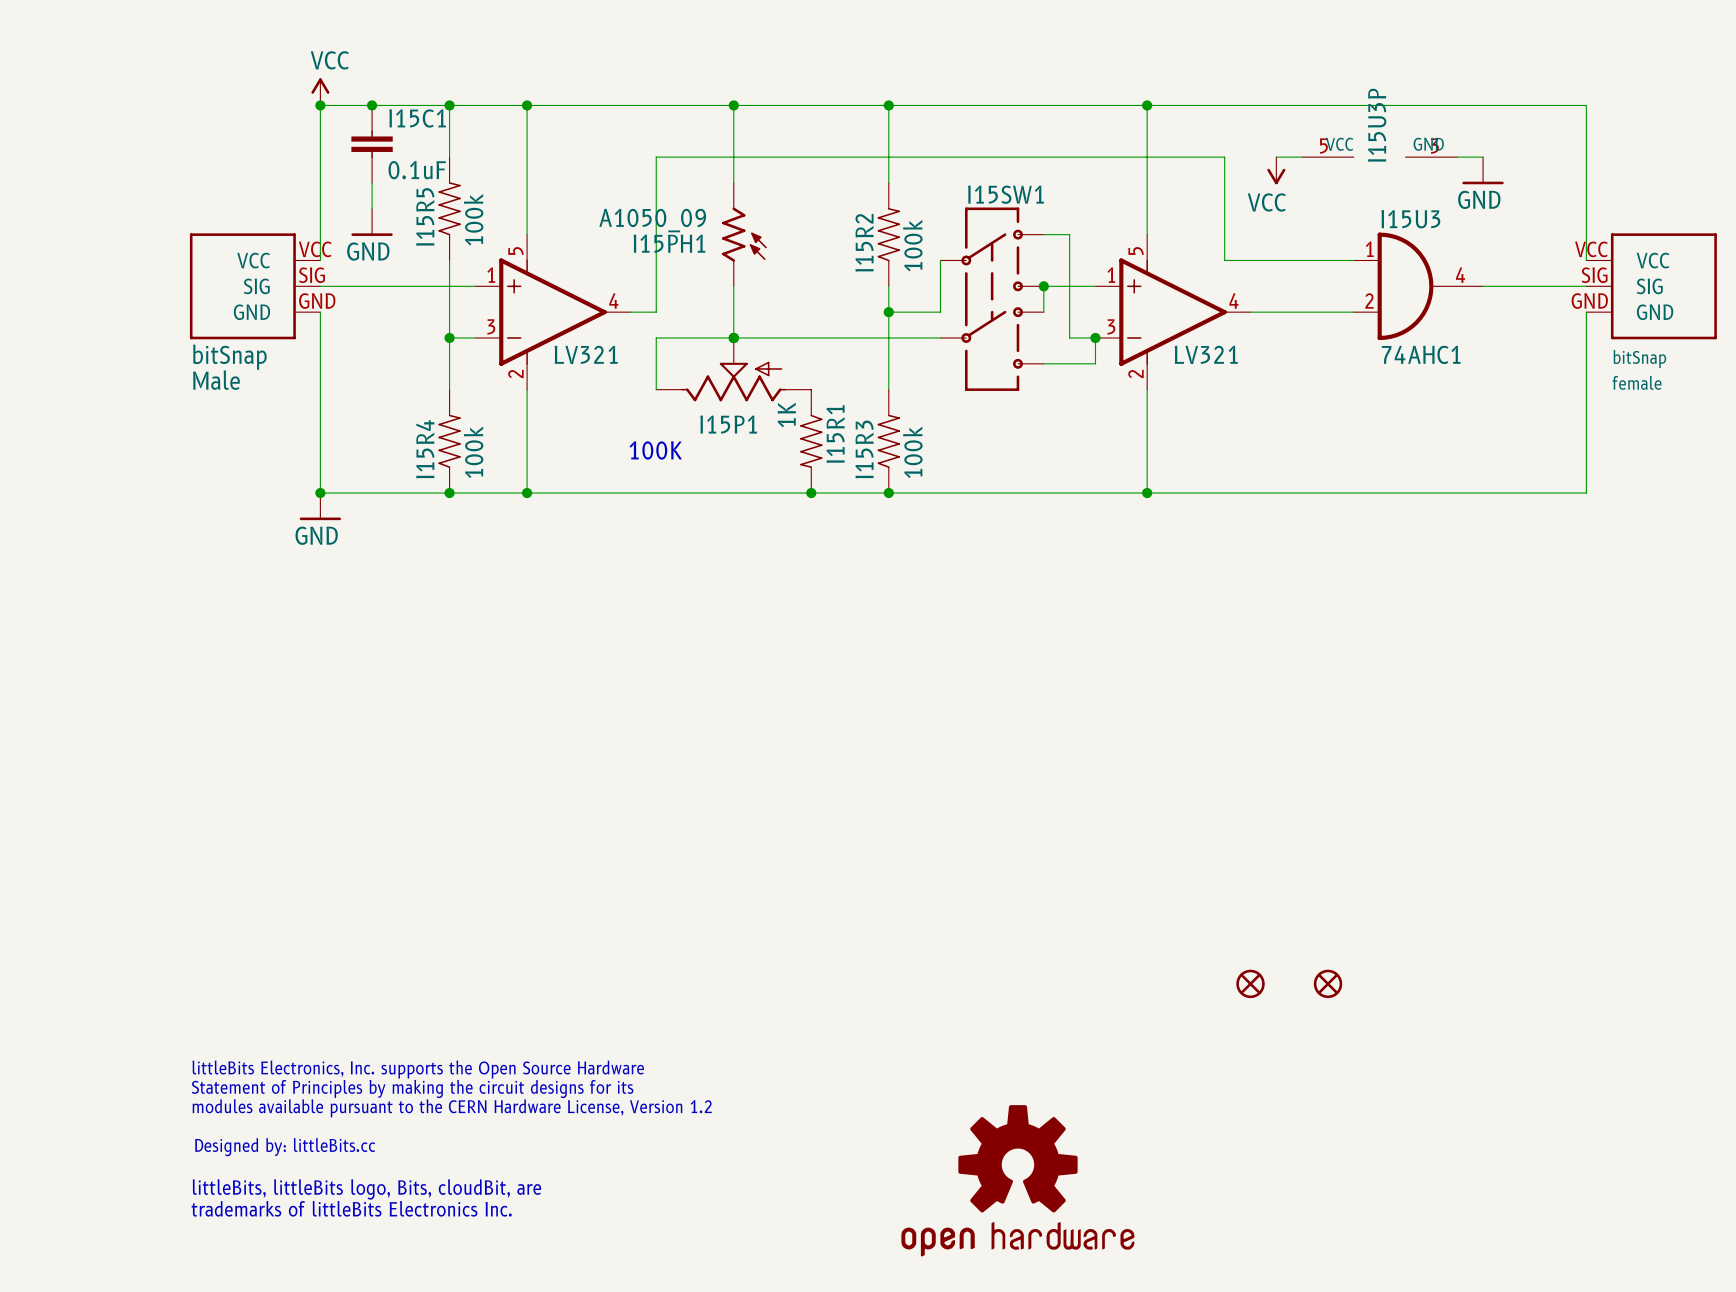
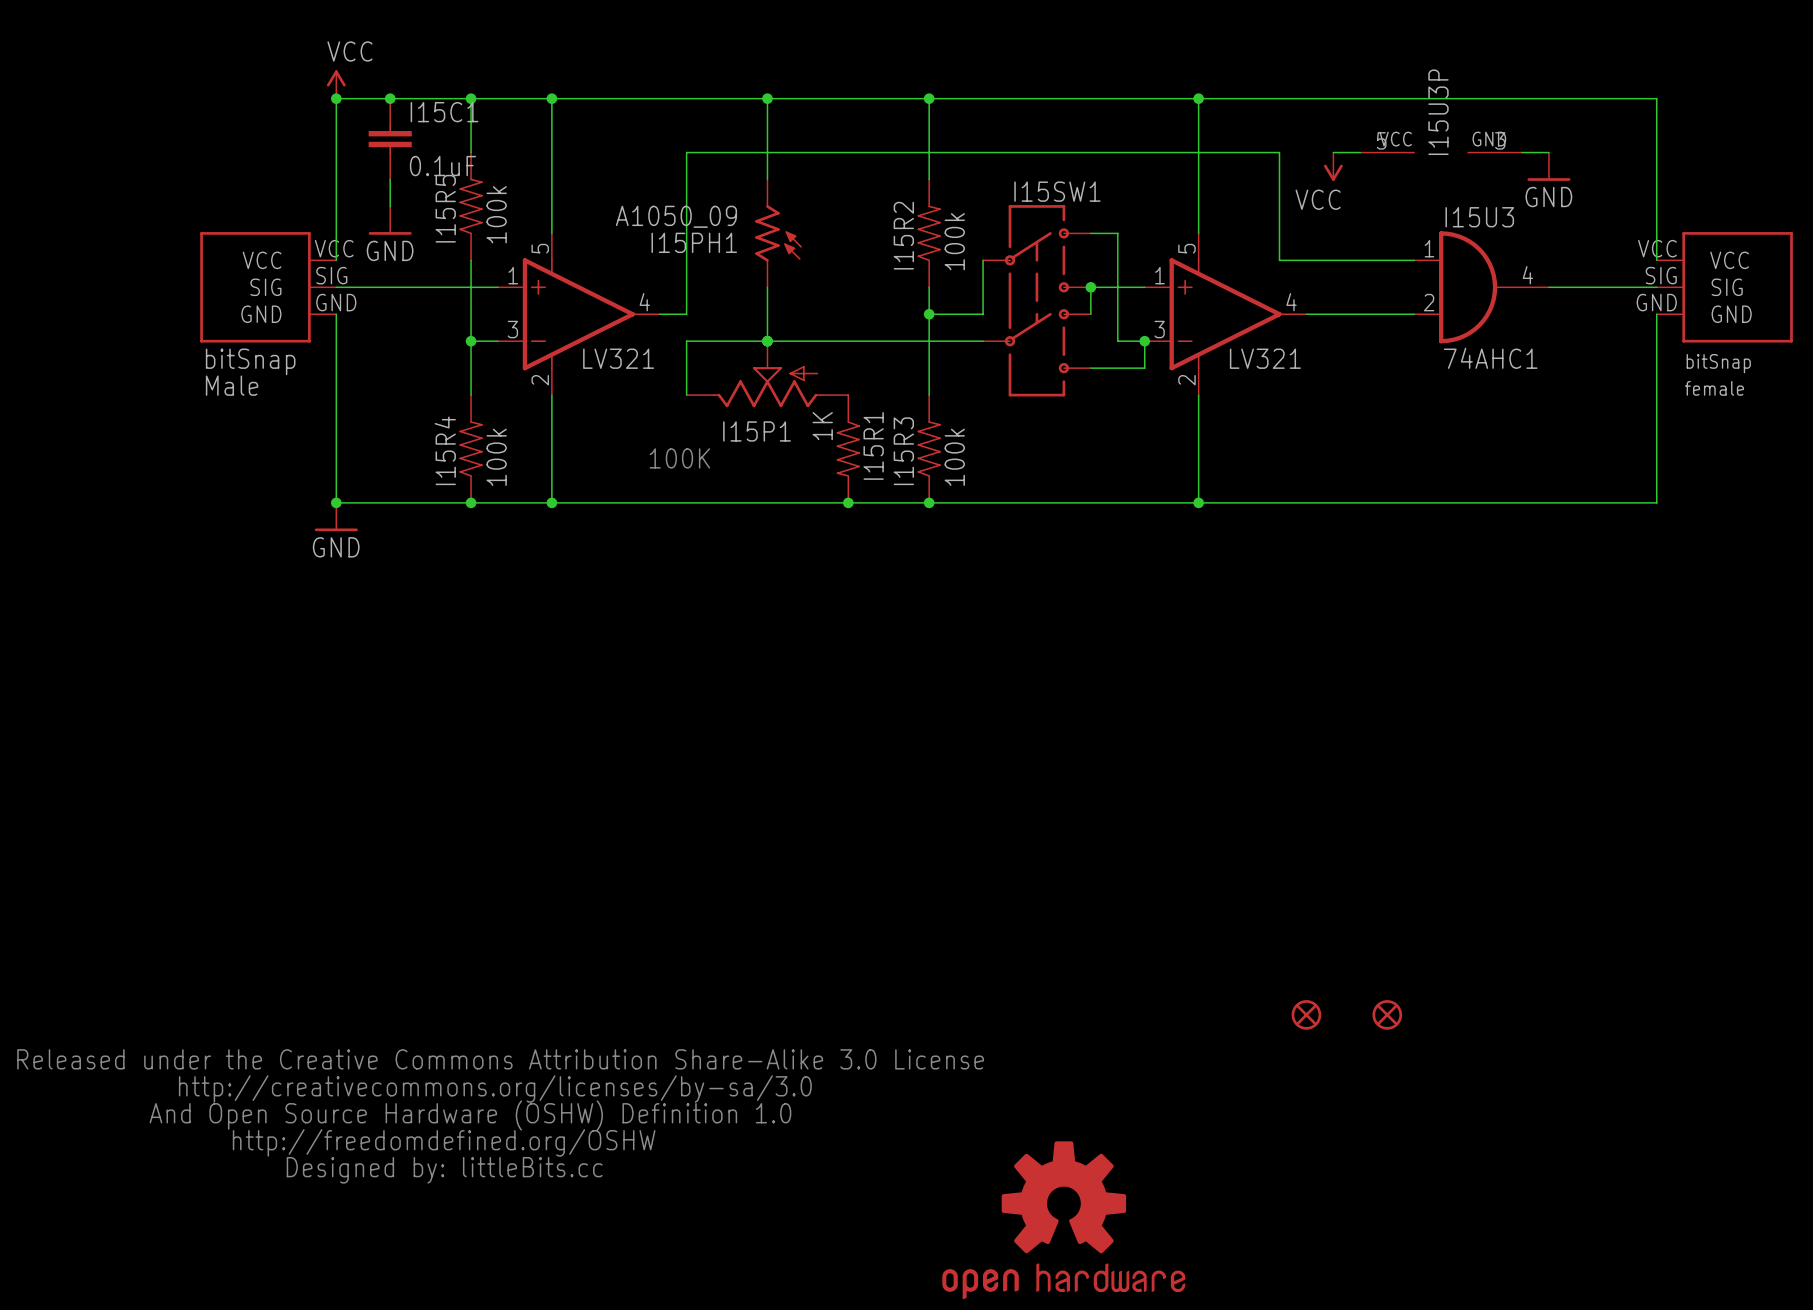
part: none -> (500, 1116)
part: (451, 1138) -> none

